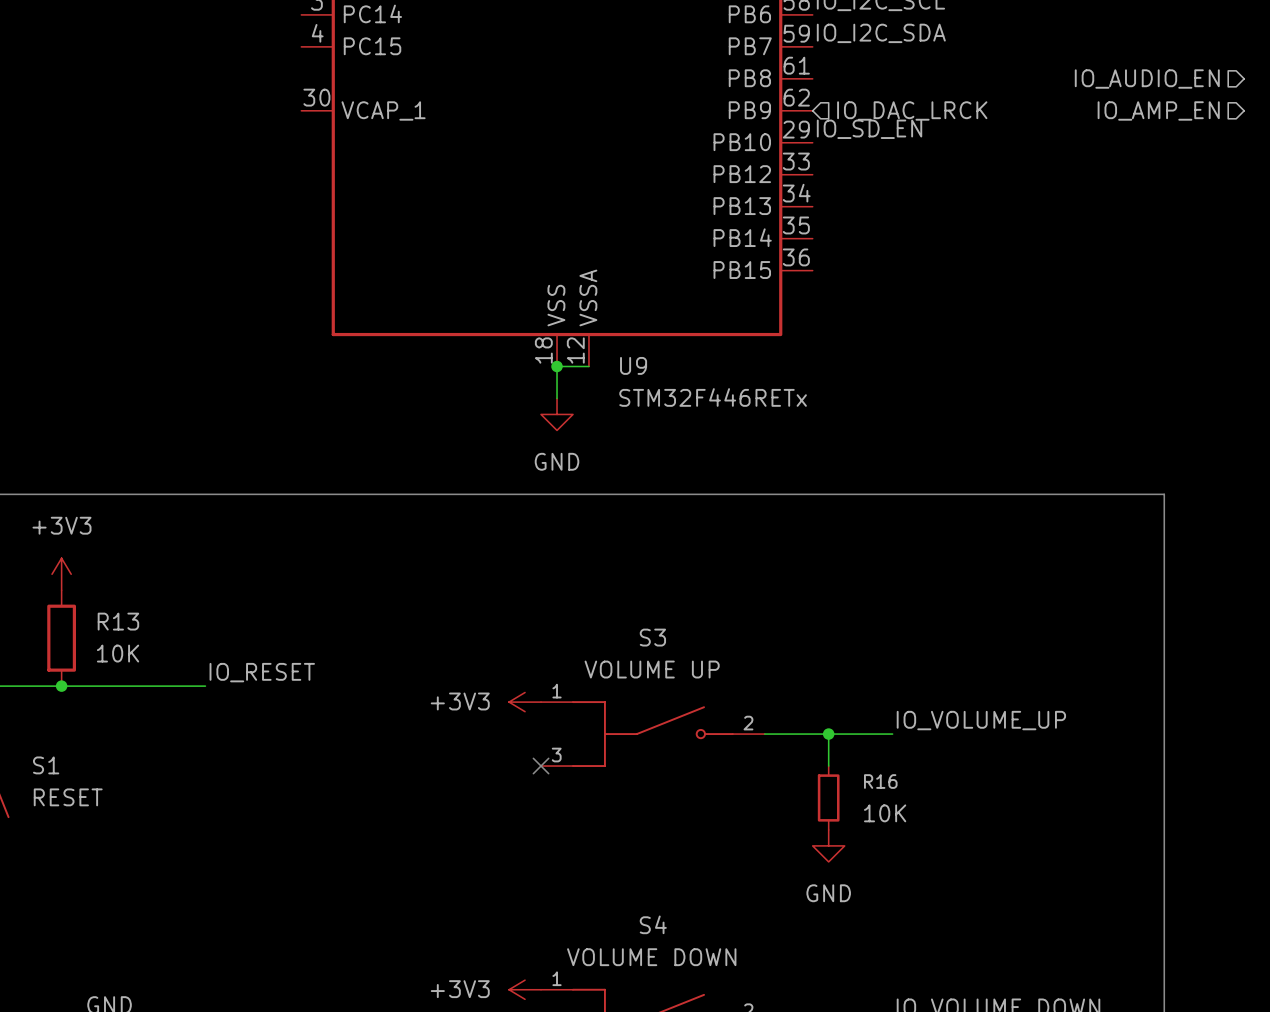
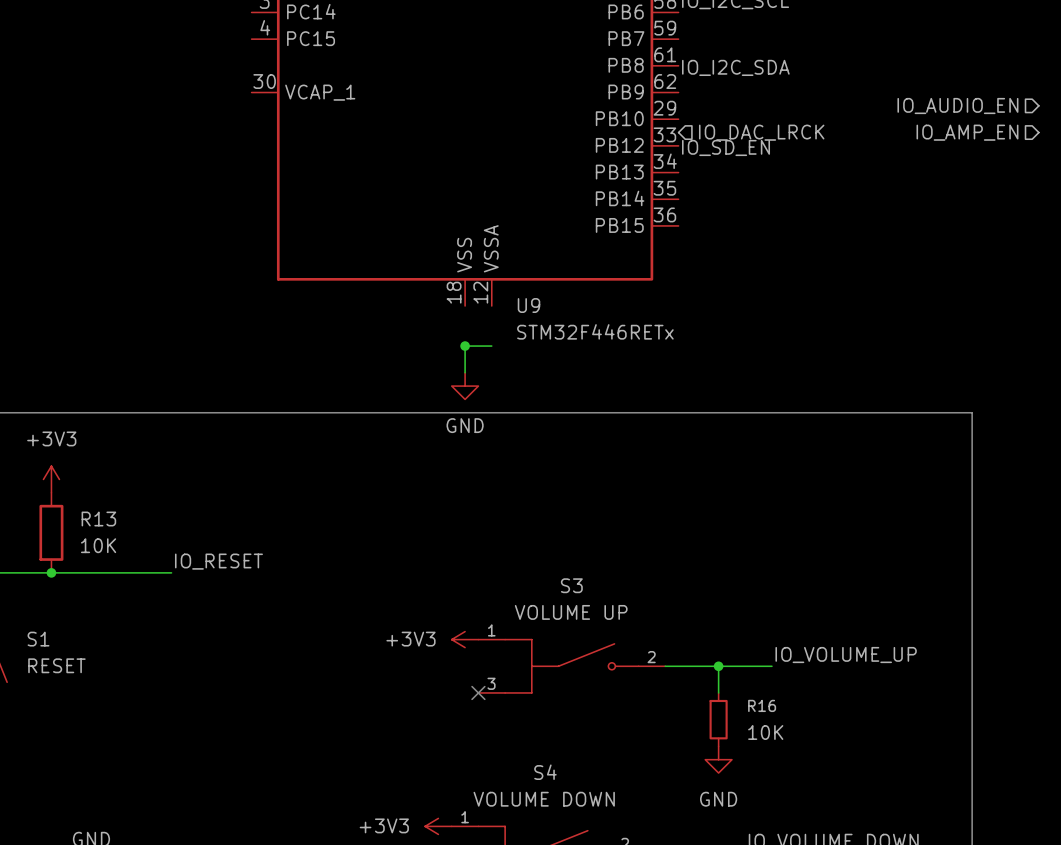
label position: IO_I2C_SDA (881, 33) -> IO_I2C_SDA (735, 67)
hierarchical label position: IO_AUDIO_EN (1147, 79) -> IO_AUDIO_EN (957, 106)
hierarchical label position: IO_DAC_LRCK (912, 110) -> IO_DAC_LRCK (761, 132)
hierarchical label position: IO_AMP_EN (1158, 110) -> IO_AMP_EN (967, 132)
label position: IO_SD_EN (869, 129) -> IO_SD_EN (726, 147)
junction position: (557, 366) -> (465, 346)
wire: (588, 366) (557, 366) (557, 398) -> (491, 346) (465, 346) (465, 372)
power symbol position: GND (557, 414) -> GND (465, 386)
power symbol position: +3V3 (525, 702) -> +3V3 (465, 639)
label position: IO_VOLUME_UP (981, 720) -> IO_VOLUME_UP (846, 655)
S3 position: (652, 734) -> (571, 666)
wire: (764, 734) (892, 734) -> (665, 666) (771, 666)
wire: (828, 734) (828, 766) -> (718, 666) (718, 692)
junction position: (828, 734) -> (718, 666)
no-connect mark position: (541, 766) -> (478, 692)
R16 position: (828, 797) -> (718, 719)
power symbol position: GND (828, 845) -> GND (718, 759)

